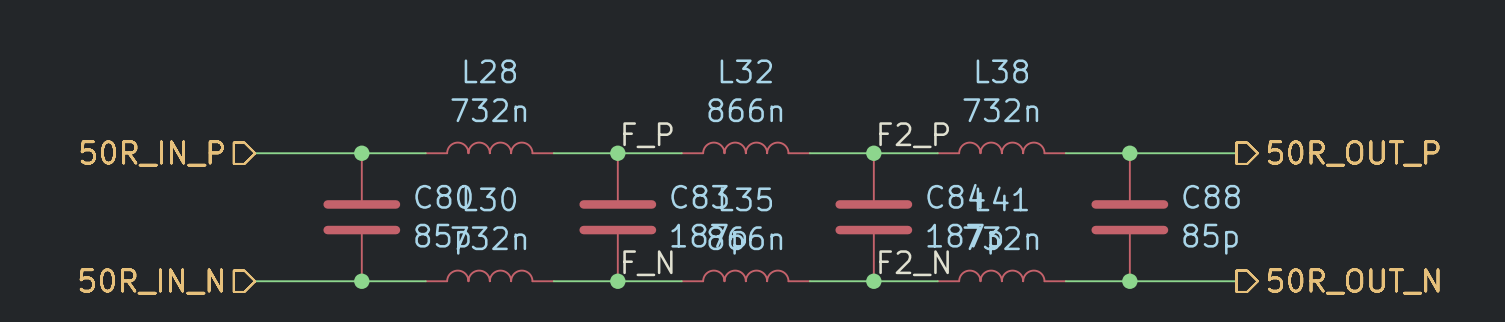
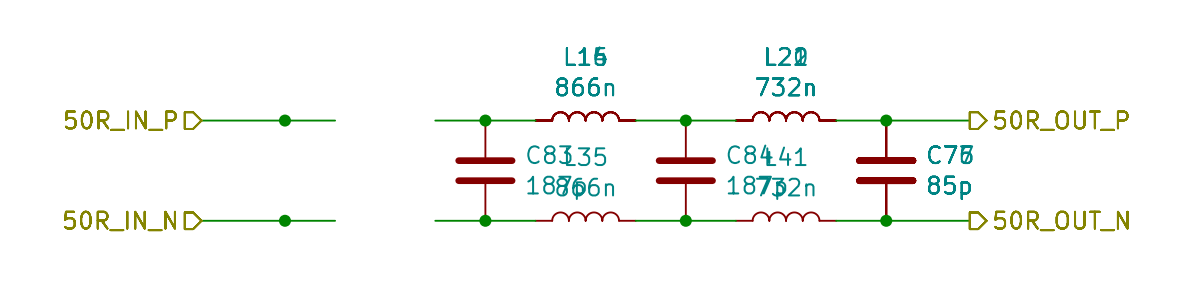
label: F_P (647, 135) -> none
label: F2_P (914, 135) -> none
L28: 732n (489, 147) -> none
L32: 866n (745, 147) -> none
part: none -> 866n (585, 116)
part: none -> 866n (585, 116)
part: none -> 866n (585, 116)
L38: 732n (1001, 147) -> none
part: none -> 732n (786, 116)
part: none -> 732n (786, 116)
part: none -> 732n (786, 116)
C80: 85p (361, 217) -> none
C88: 85p (1129, 217) -> none
part: none -> 85p (886, 170)
part: none -> 85p (886, 170)
part: none -> 85p (886, 170)
label: F_N (647, 263) -> none
label: F2_N (914, 263) -> none
L30: 732n (489, 275) -> none

